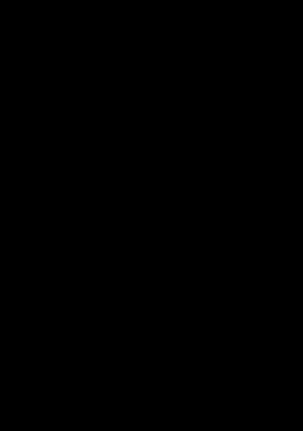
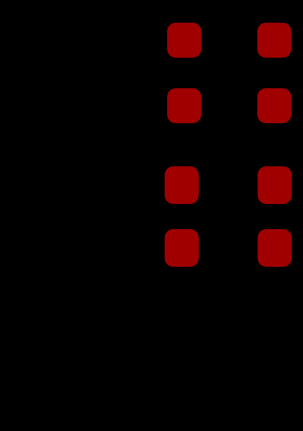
part: none -> (184, 72)
part: none -> (274, 72)
part: none -> (181, 216)
part: none -> (274, 216)

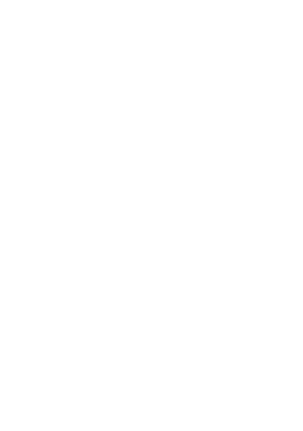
part: (184, 72) -> none
part: (274, 72) -> none
part: (181, 216) -> none
part: (274, 216) -> none

